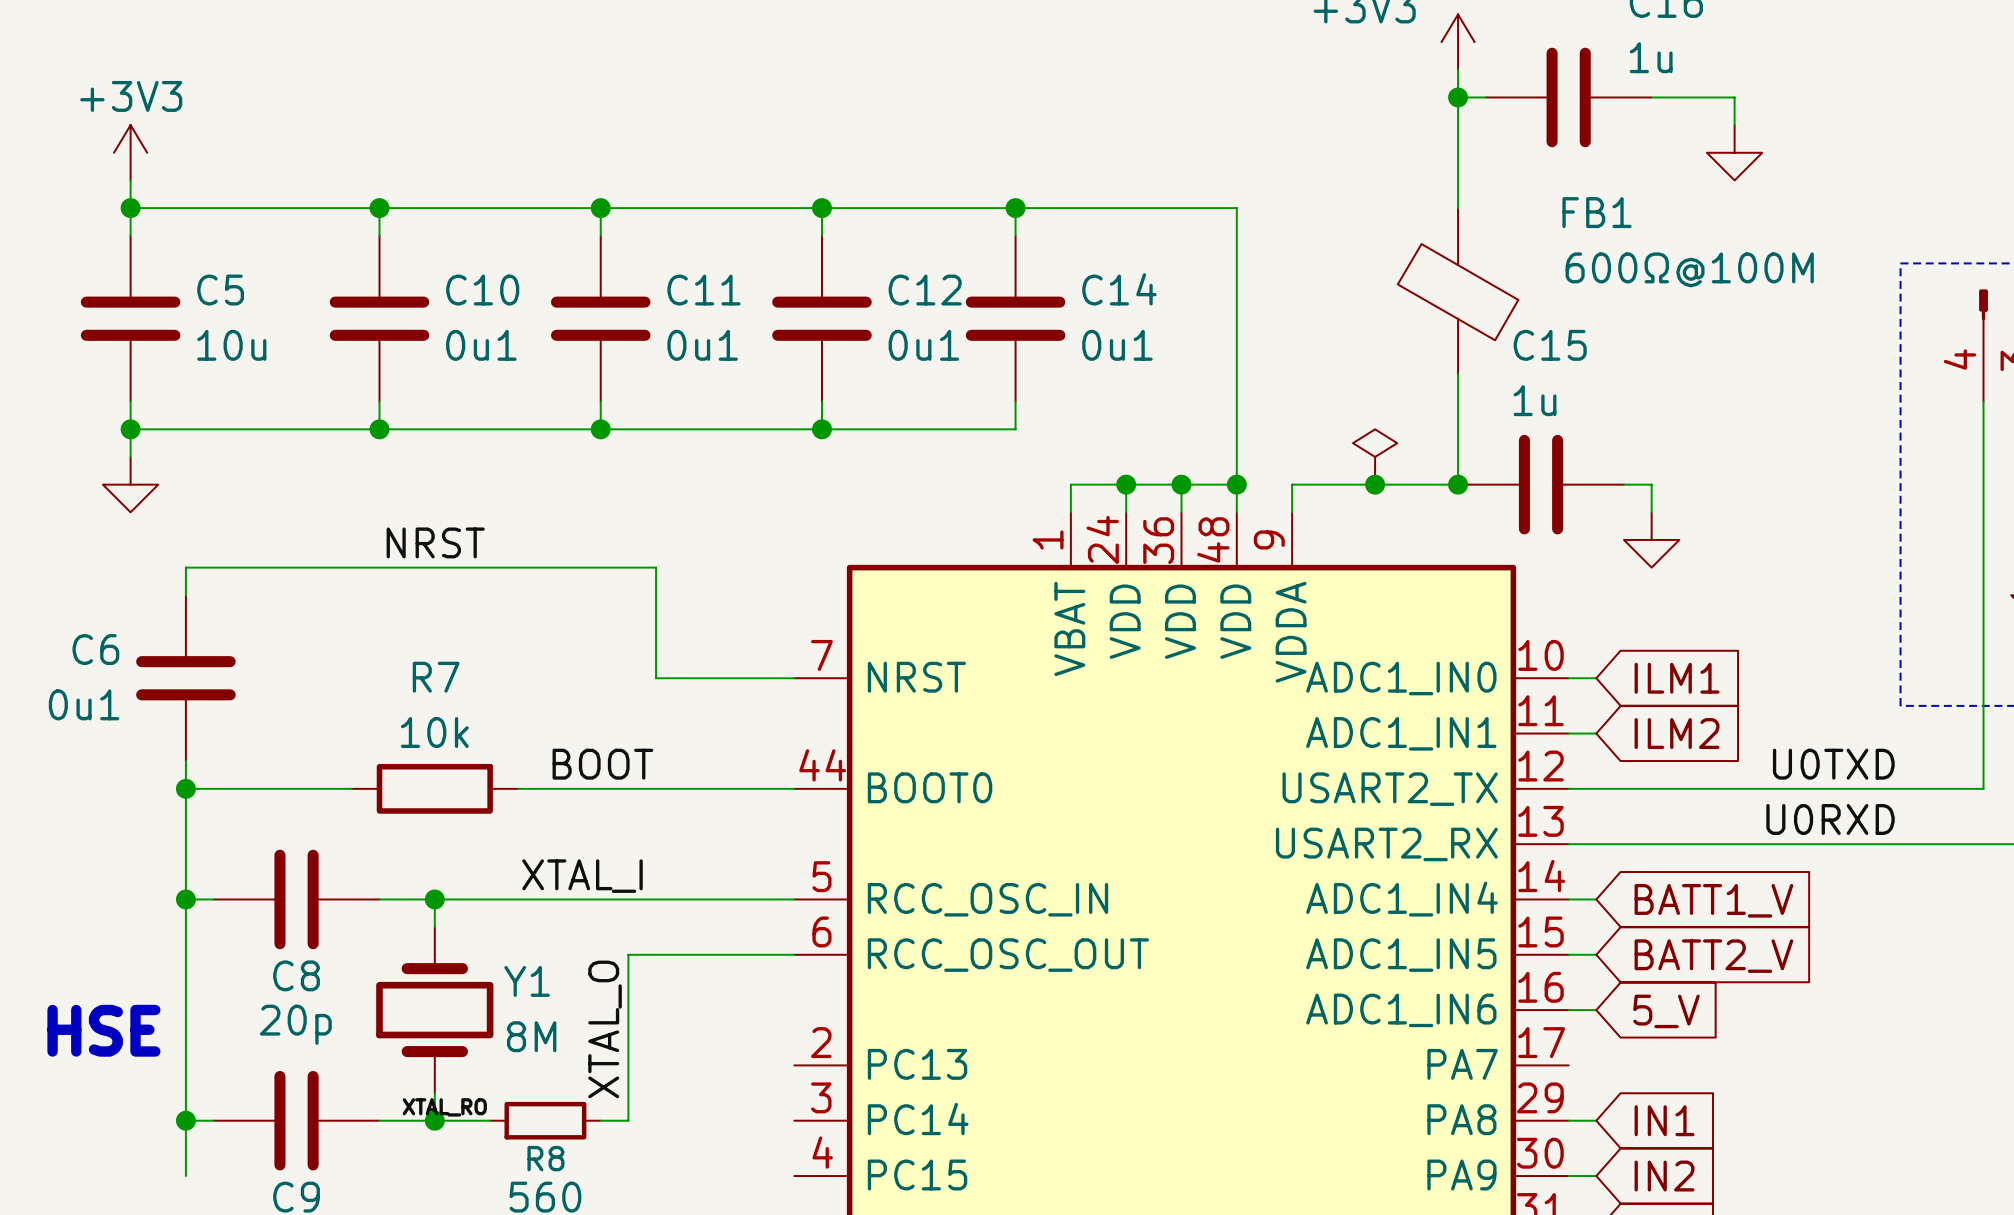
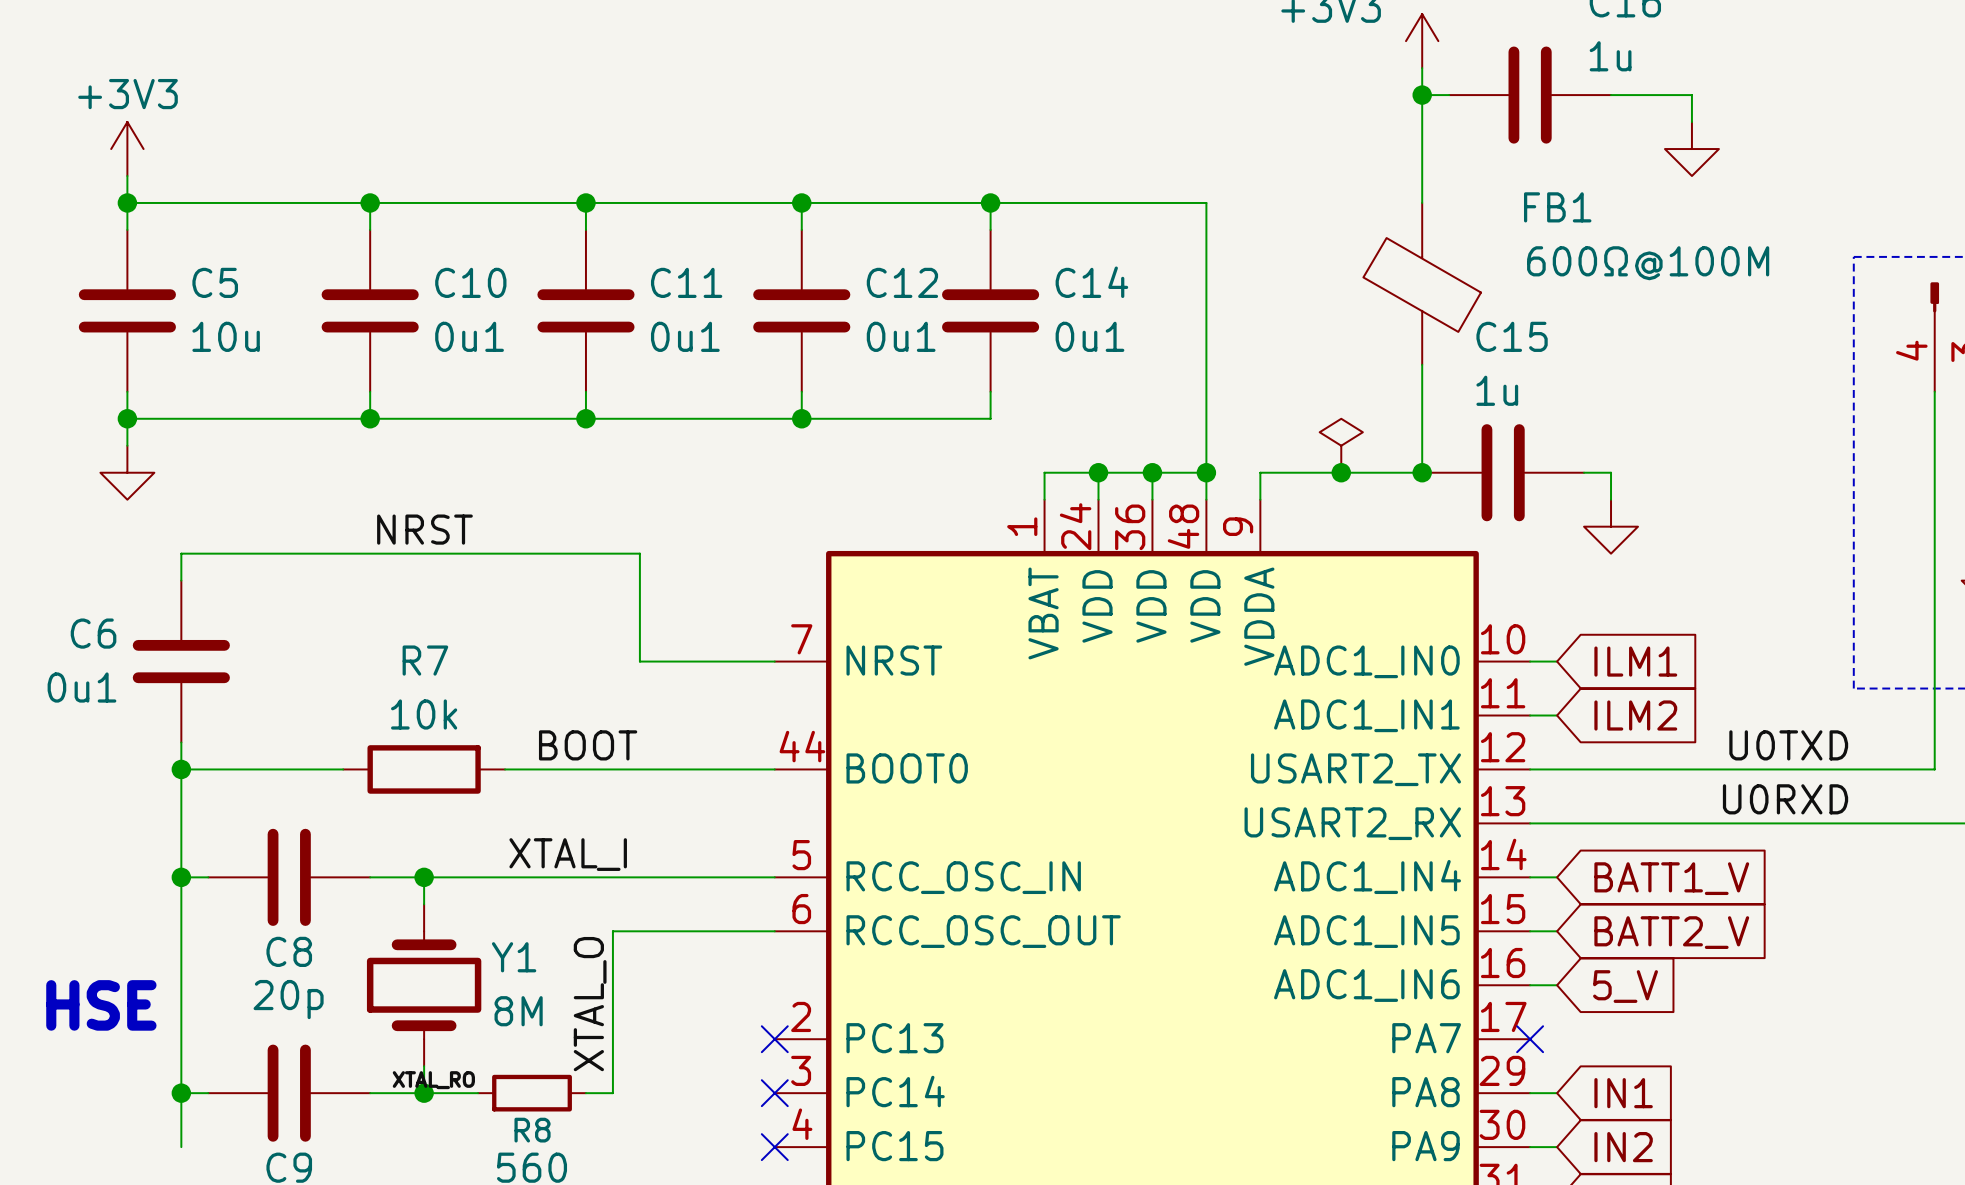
no-connect mark: none -> (774, 1039)
no-connect mark: none -> (1530, 1039)
no-connect mark: none -> (774, 1093)
no-connect mark: none -> (774, 1147)

